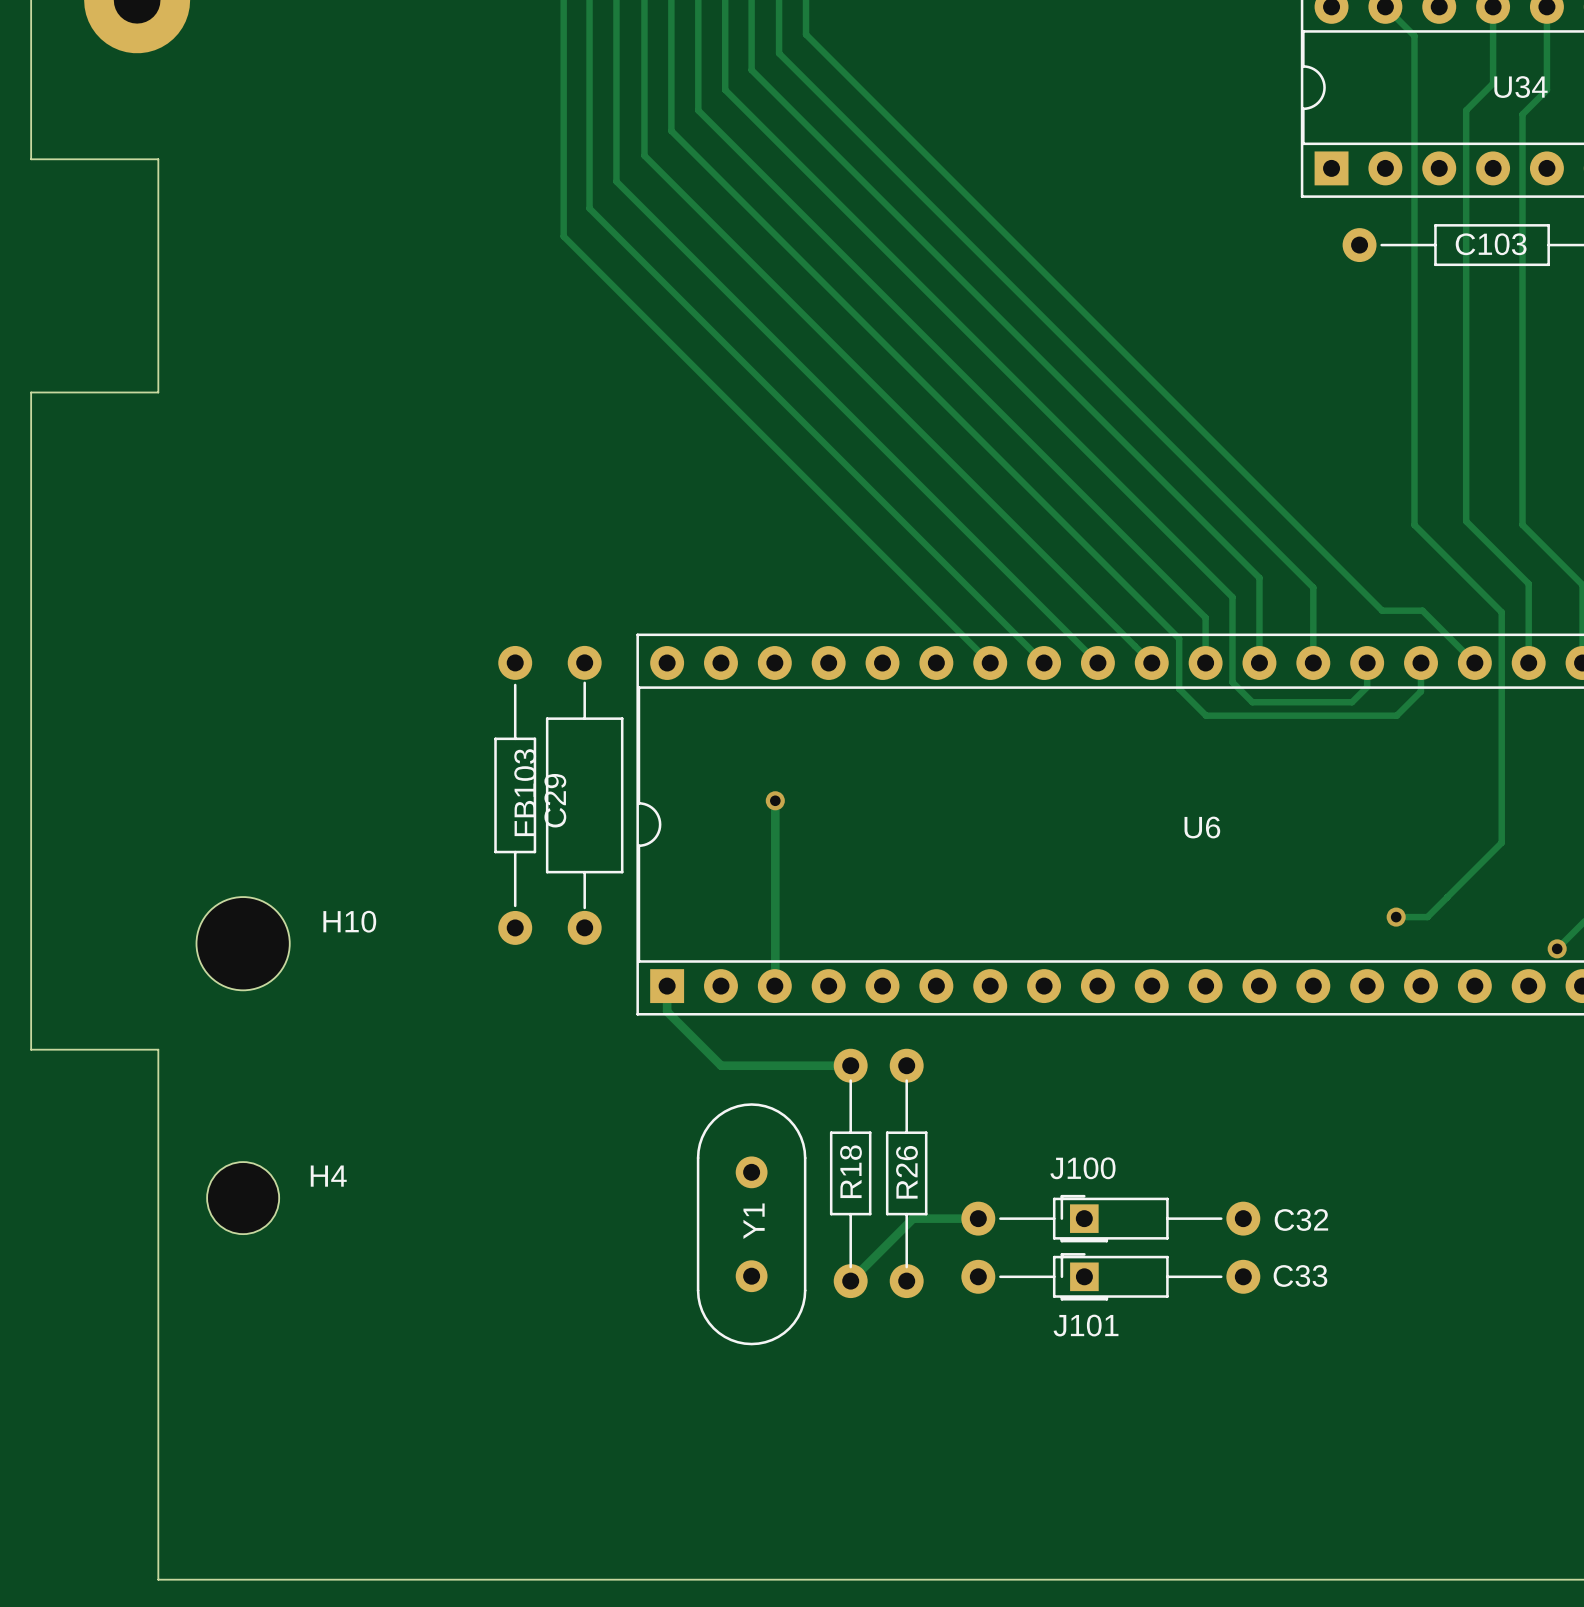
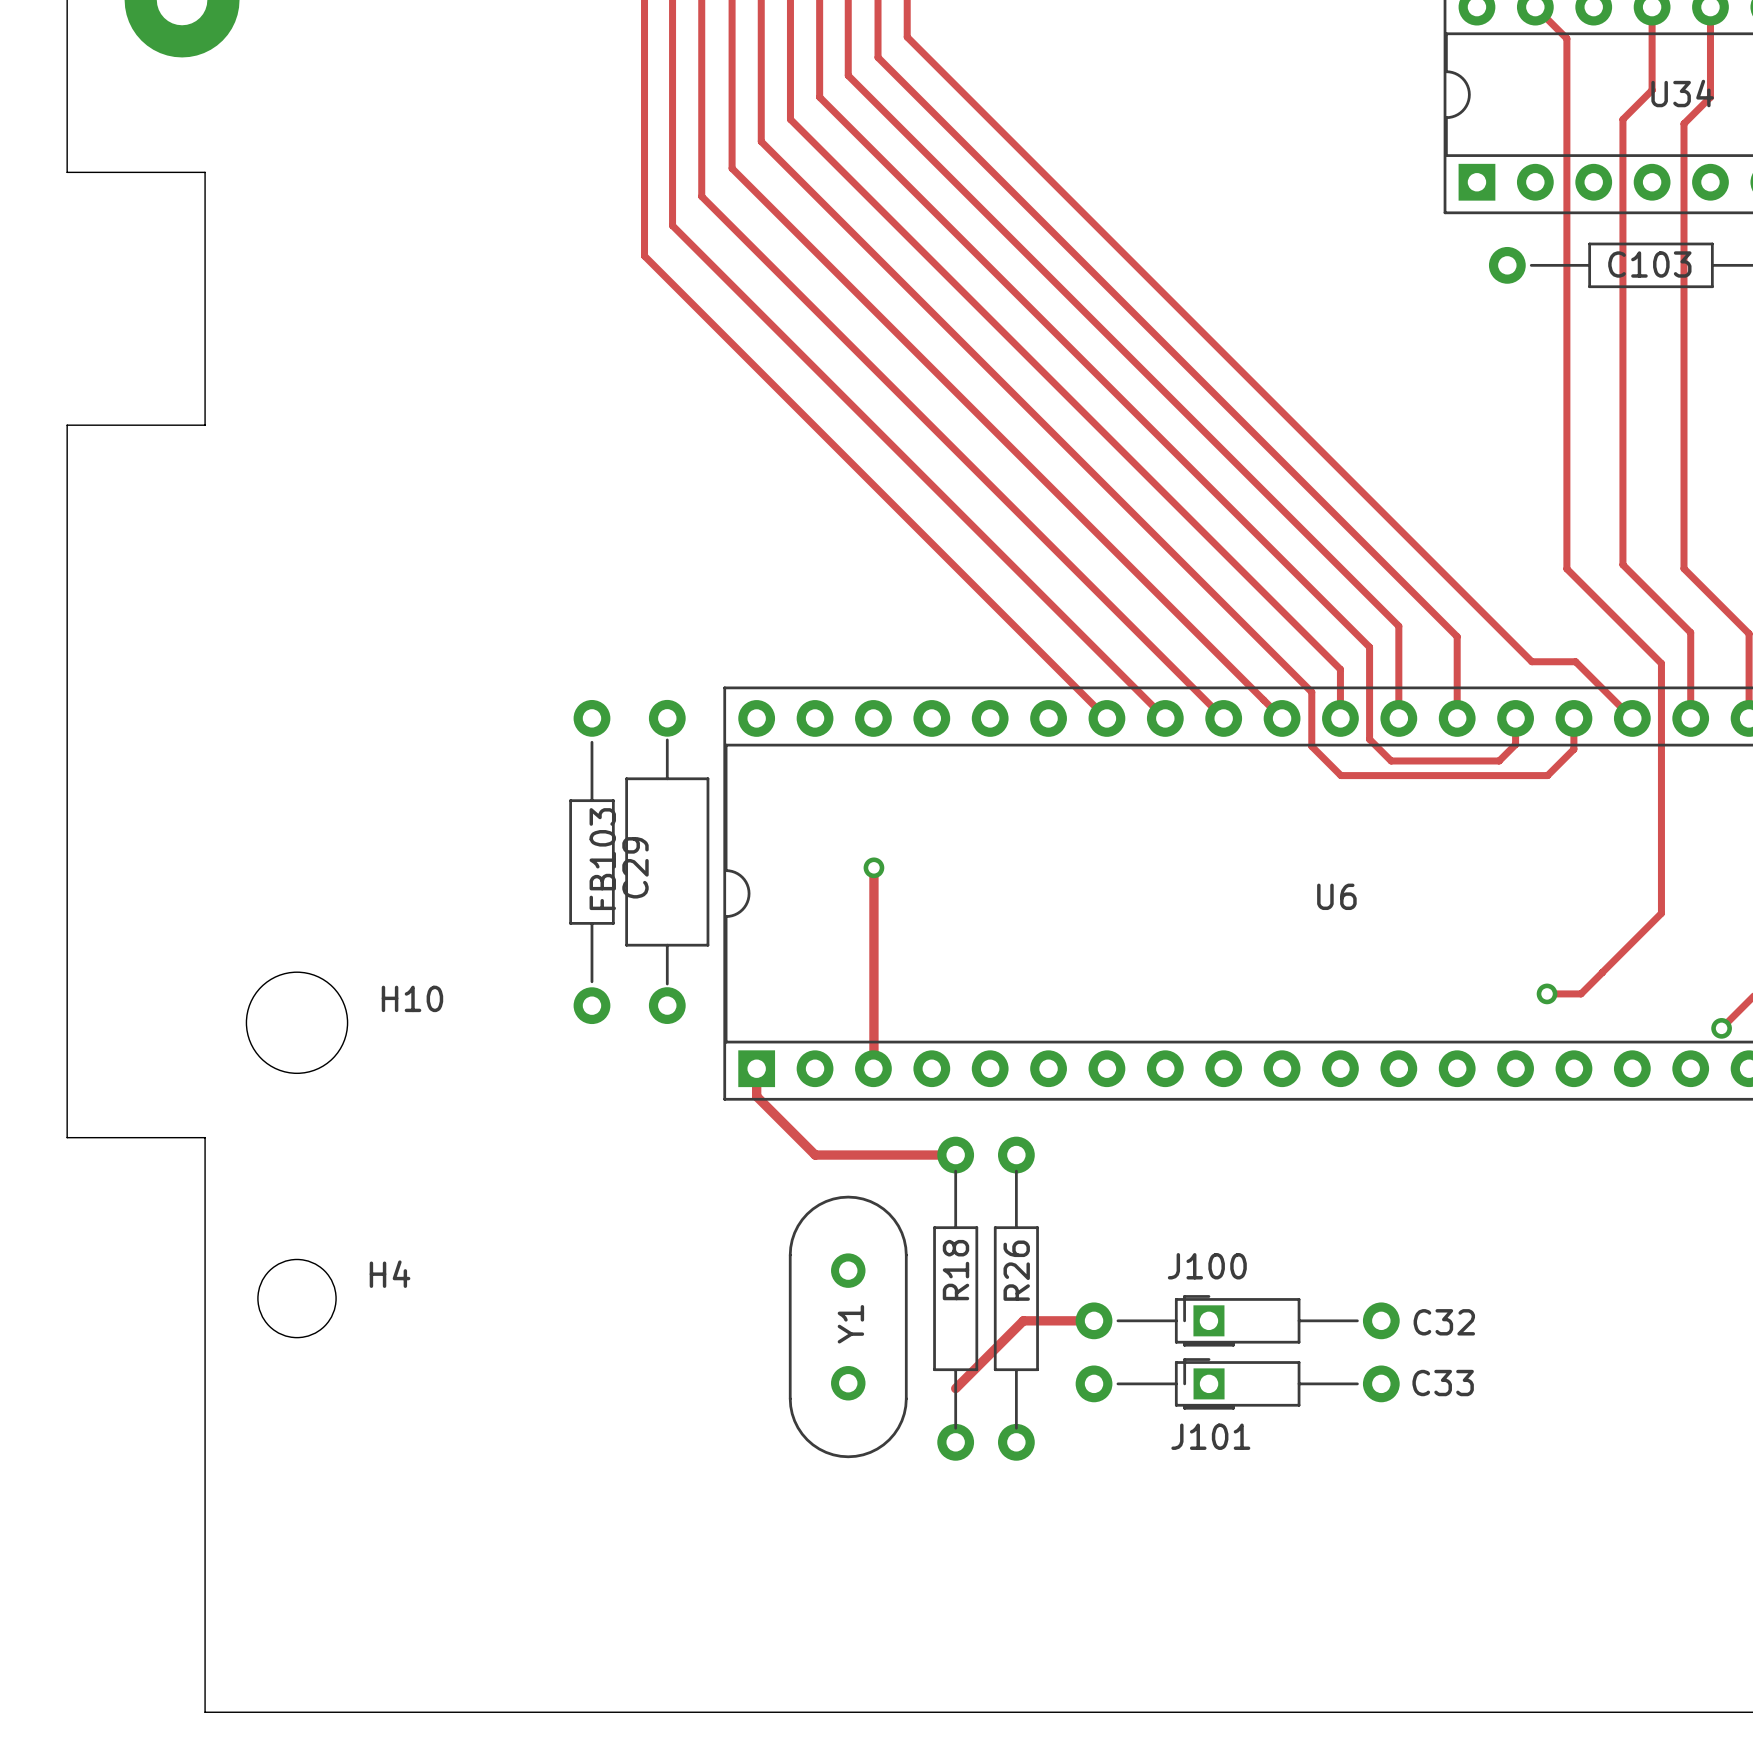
R18 footprint: [829, 1048, 872, 1299] -> [933, 1136, 979, 1461]
R26 footprint: [885, 1048, 928, 1299] -> [993, 1136, 1039, 1461]

